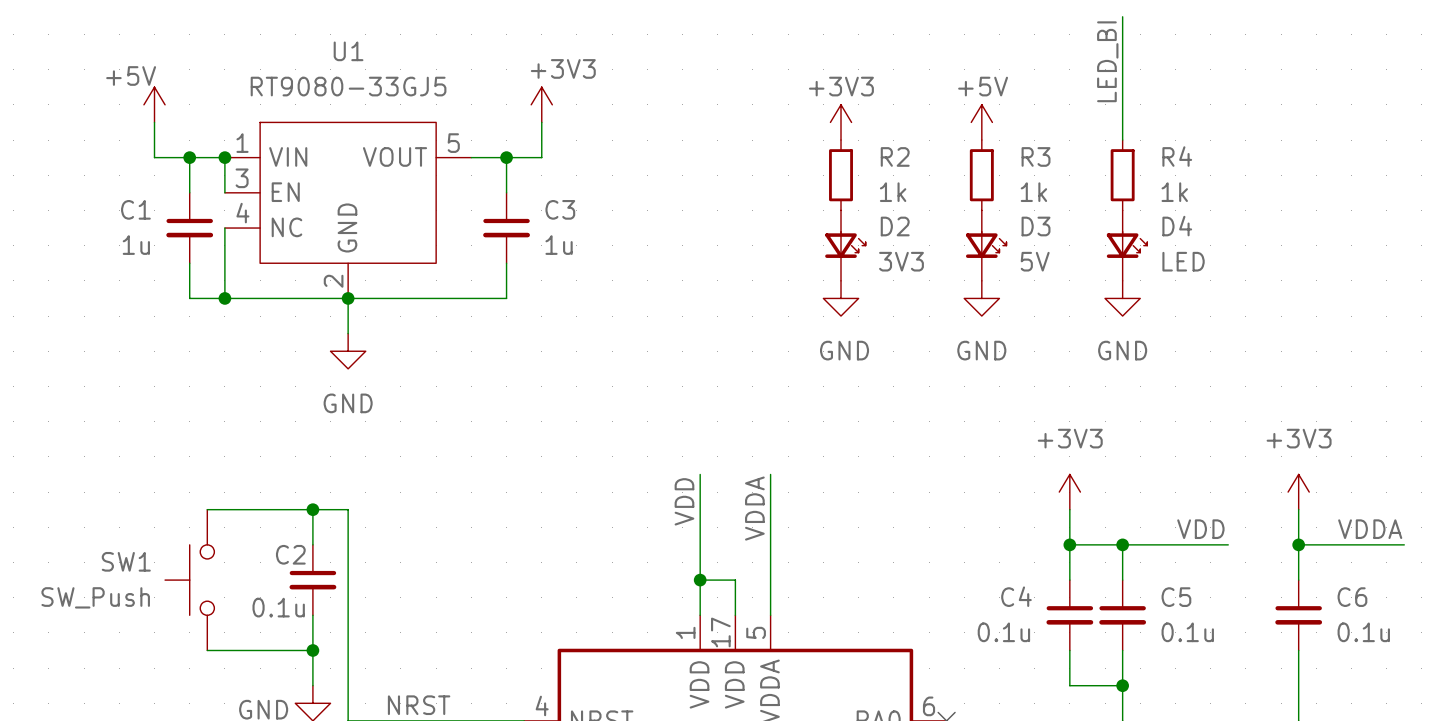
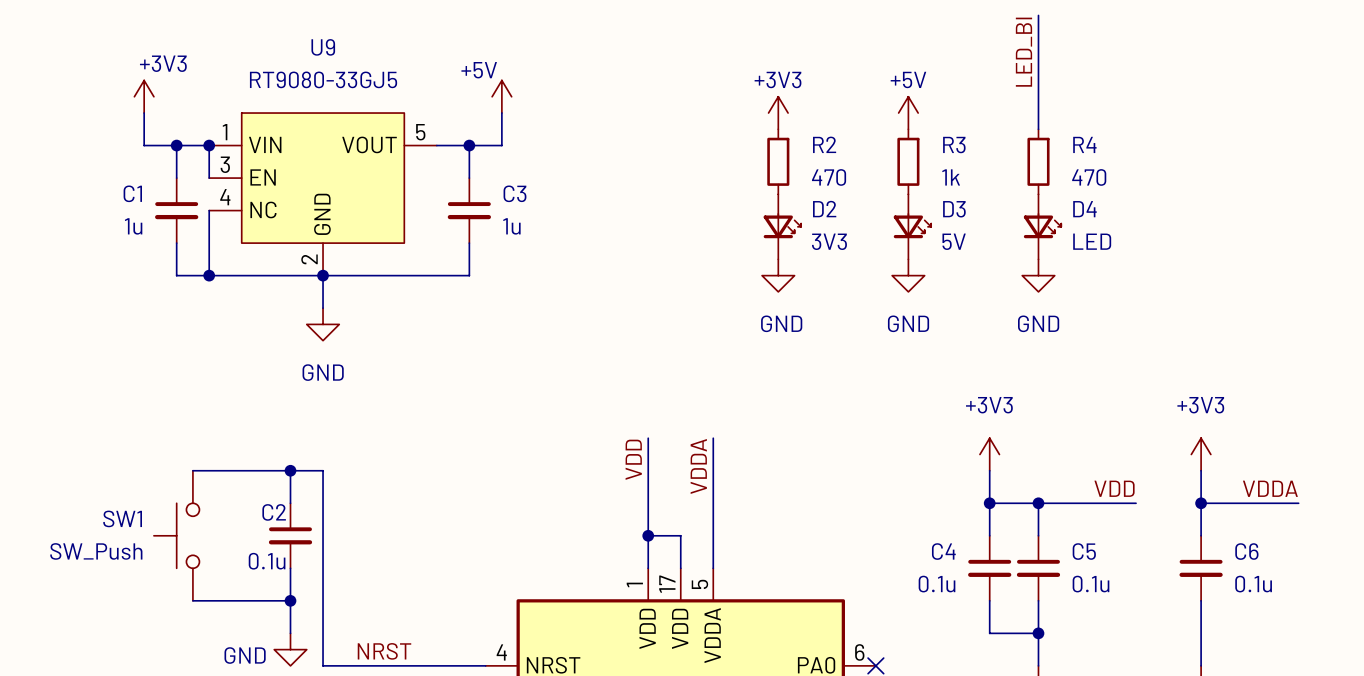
U1 name: U1 (348, 51) -> U9 (323, 47)
power symbol: +5V (154, 104) -> +3V3 (144, 96)
power symbol: +3V3 (541, 104) -> +5V (501, 96)
R2 value: 1k (893, 192) -> 470 (829, 177)
R4 value: 1k (1174, 192) -> 470 (1089, 177)

